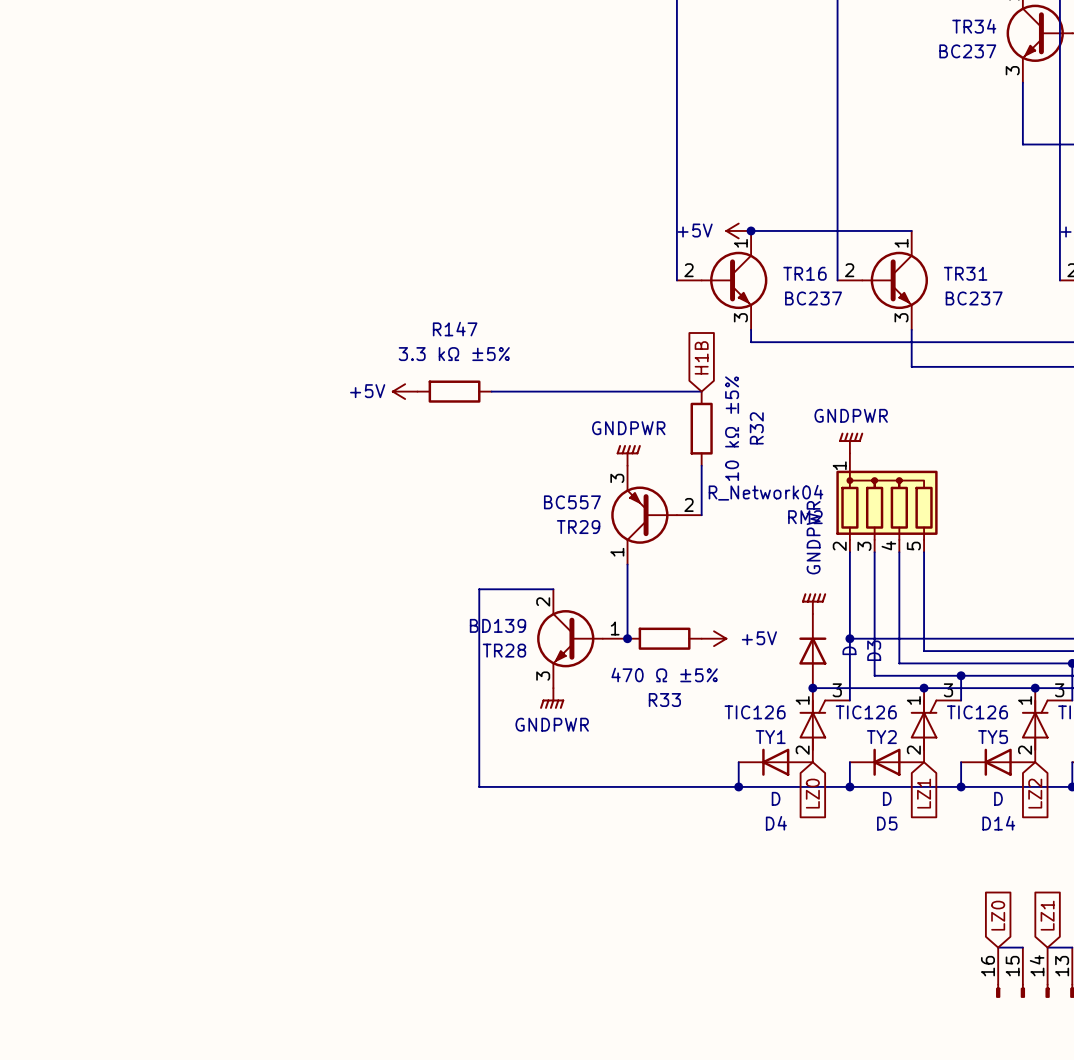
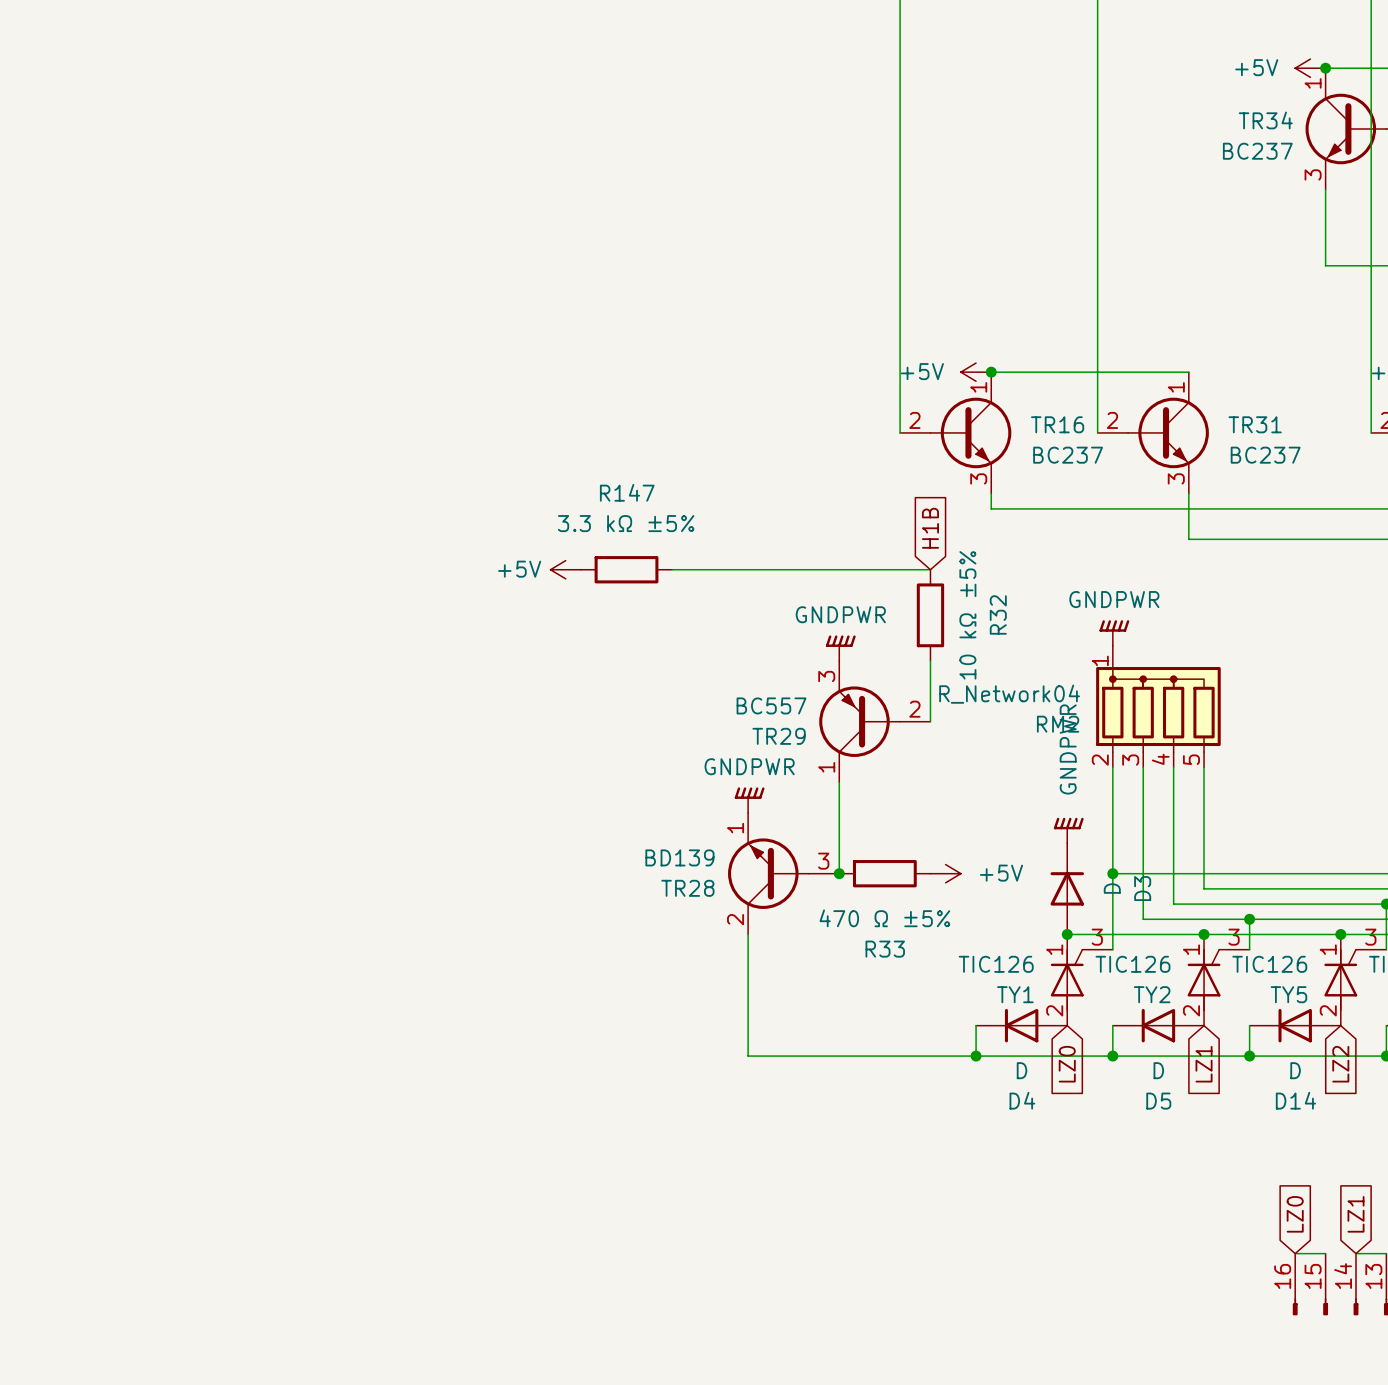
TR28 symbol: [537, 589, 628, 689] -> [728, 812, 840, 935]
wire: (553, 589) (479, 589) (479, 786) (553, 786) -> (748, 934) (748, 1056)
power symbol rotation: 0° (552, 698) -> 180° (749, 800)
power symbol position: GNDPWR (552, 698) -> GNDPWR (749, 800)

